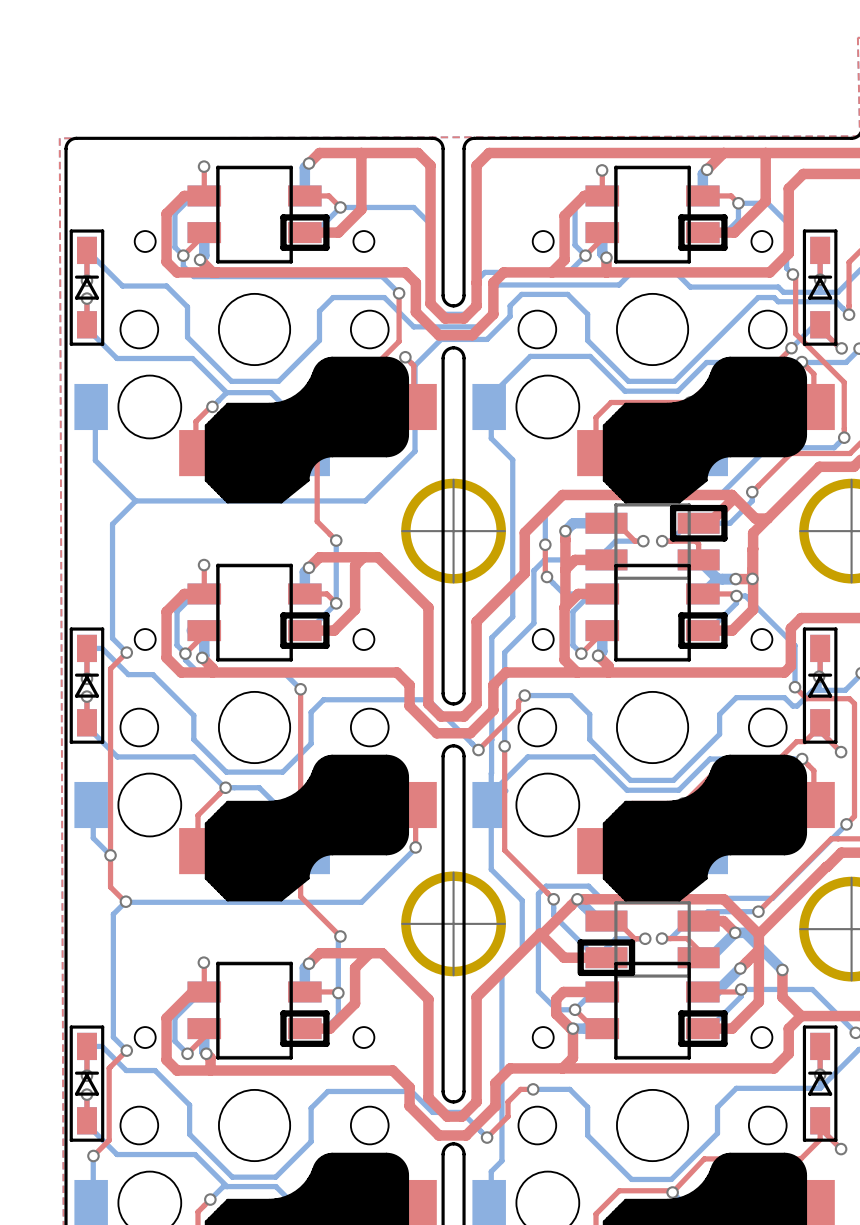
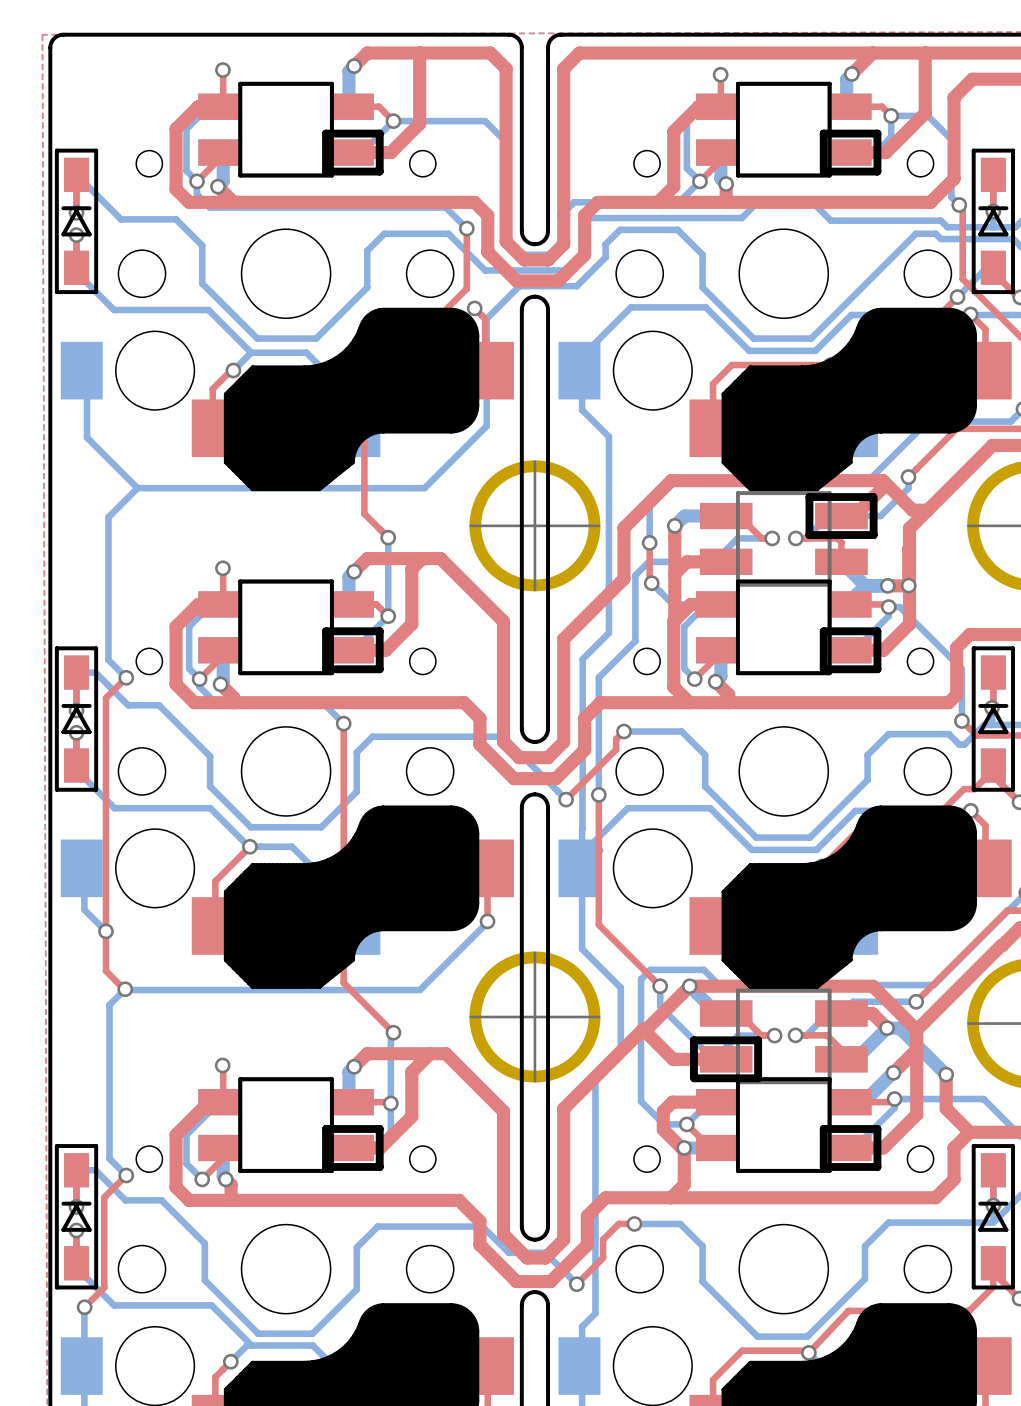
part footprint: [187, 165, 330, 263] -> [198, 81, 384, 178]
part footprint: [585, 165, 728, 263] -> [696, 81, 882, 178]
board edge: (217, 167) (291, 167) (291, 261) (217, 261) (217, 167) -> none
board edge: (615, 167) (615, 261) (689, 261) (689, 167) (615, 167) -> none
part footprint: [187, 563, 330, 661] -> [198, 579, 384, 676]
part footprint: [585, 563, 728, 661] -> [696, 579, 882, 676]
board edge: (217, 565) (217, 659) (291, 659) (291, 565) (217, 565) -> none
board edge: (615, 565) (615, 659) (689, 659) (689, 565) (615, 565) -> none
part footprint: [187, 961, 330, 1060] -> [198, 1077, 384, 1173]
part footprint: [585, 961, 728, 1060] -> [696, 1077, 882, 1173]
board edge: (217, 963) (217, 1057) (291, 1057) (291, 963) (217, 963) -> none
board edge: (615, 963) (615, 1057) (689, 1057) (689, 963) (615, 963) -> none

